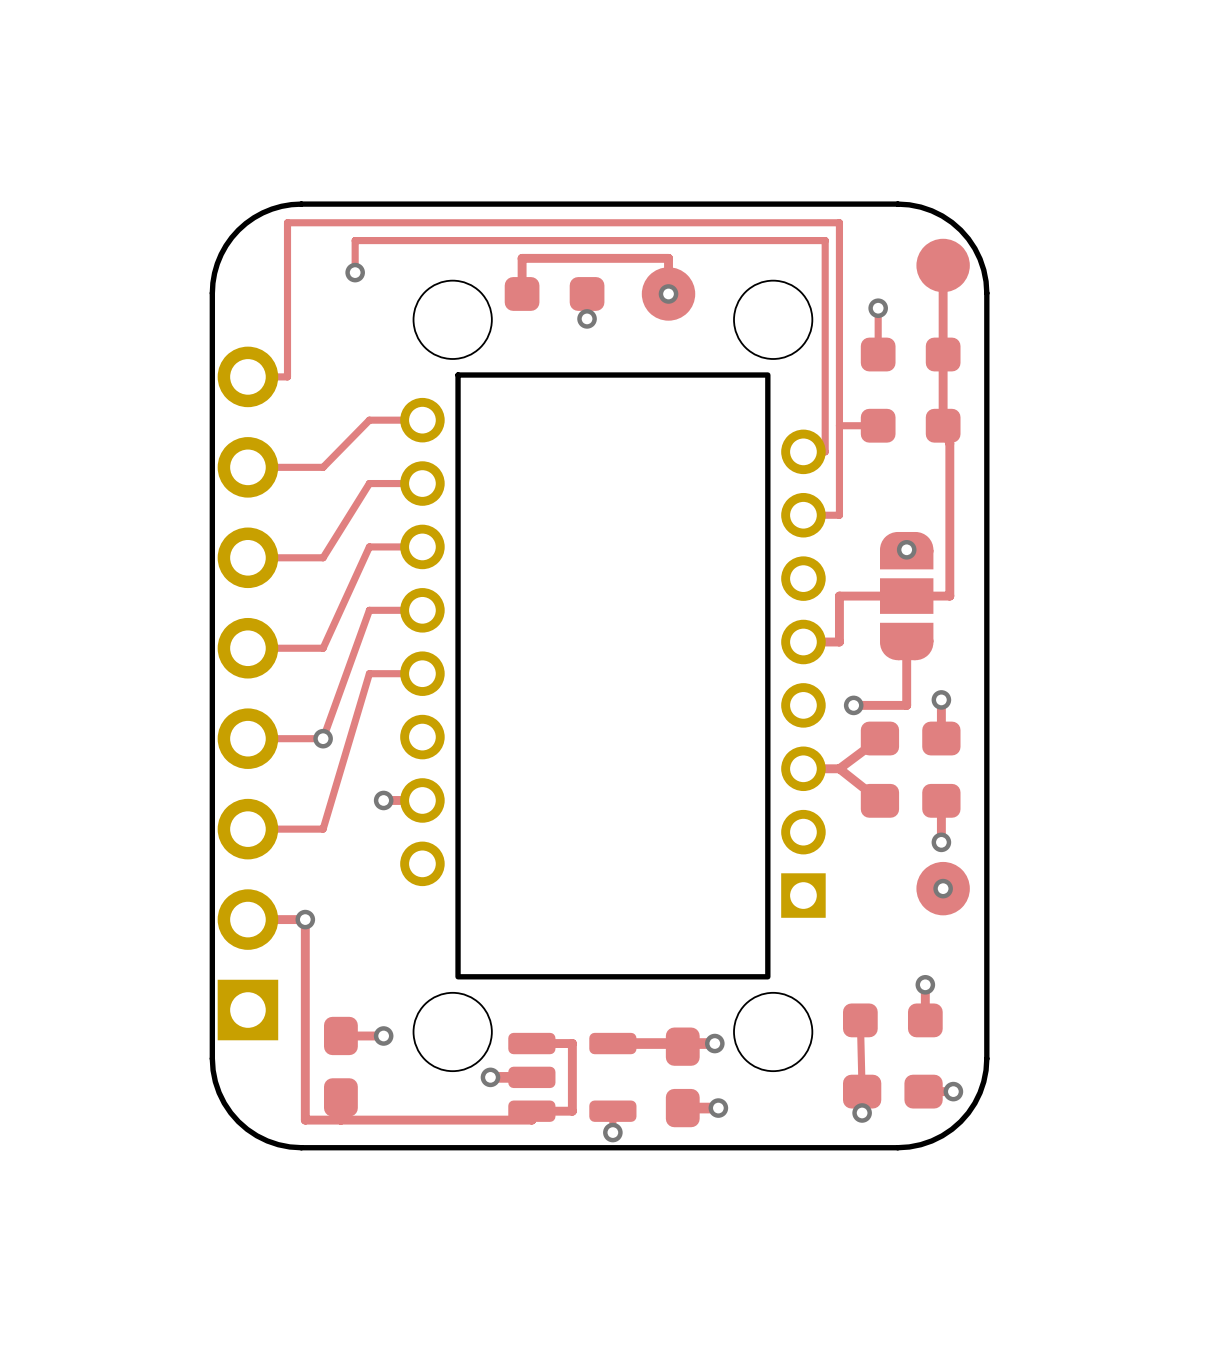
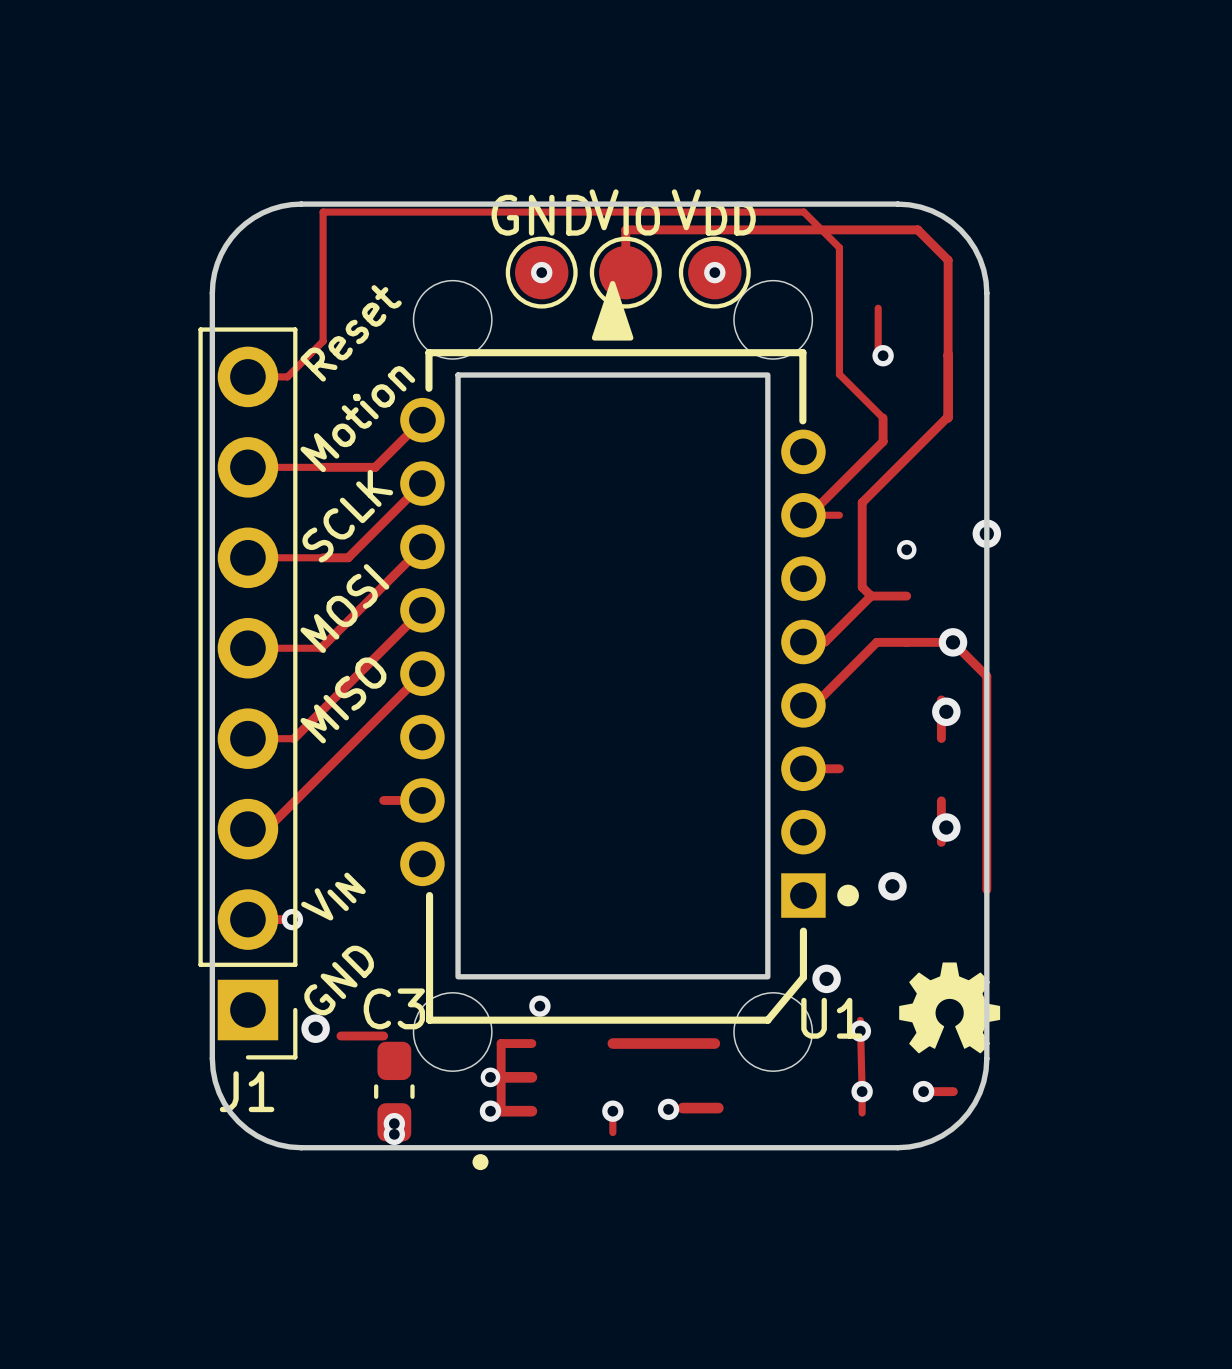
track: (839, 247) (839, 222) (287, 222) (287, 376) -> (839, 247) (803, 212) (323, 212) (323, 341) (287, 376)
track: (943, 265) (943, 425) (949, 443) (949, 596) (906, 596) -> none
part: (943, 265) -> none
track: (355, 272) (355, 240) (825, 240) (825, 451) (803, 451) -> none
via: (355, 272) -> none
via: none -> (541, 272)
part: none -> (625, 272)
part: none -> (714, 272)
via: none -> (714, 272)
part footprint: [504, 277, 605, 311] -> [505, 236, 578, 309]
drawing: none -> [591, 280, 634, 341]
track: (522, 293) (522, 258) (668, 258) (668, 293) -> none
part: (668, 293) -> none
via: (668, 293) -> none
via: (878, 308) -> none
via: (587, 318) -> none
text: none -> Reset (351, 333)
part: (910, 354) -> none
via: none -> (883, 355)
track: (839, 374) (839, 515) -> (839, 374) (883, 418) (883, 441) (809, 515)
text: none -> Motion (357, 419)
track: (422, 420) (369, 420) (323, 467) -> (422, 420) (375, 467) (323, 467)
track: (839, 425) (878, 425) -> none
part: (910, 425) -> none
track: (422, 483) (369, 483) (323, 557) -> (422, 483) (348, 557) (323, 557)
text: none -> SCLK (347, 516)
via: none -> (986, 533)
track: (422, 546) (369, 546) (323, 648) (321, 648) -> (422, 546) (321, 648)
track: (871, 596) (839, 596) (839, 642) (825, 642) -> (625, 272) (625, 229) (917, 229) (948, 260) (948, 418) (862, 502) (862, 587) (871, 596) (825, 642)
part: (906, 596) -> none
text: none -> MOSI (344, 608)
track: (422, 610) (369, 610) (323, 738) (294, 738) -> (422, 610) (294, 738)
track: (906, 642) (906, 705) (853, 705) -> none
via: none -> (952, 642)
track: (422, 673) (369, 673) (323, 829) (266, 829) -> (422, 673) (266, 829)
part: (612, 675) -> none
U1: none -> (629, 686)
via size: [931, 690, 952, 710] -> [932, 697, 961, 727]
part: (247, 693) -> none
J1: none -> (247, 693)
text: none -> MISO (343, 700)
track: none -> (803, 705) (813, 705) (876, 642) (952, 642) (986, 676) (986, 889)
via: (853, 705) -> none
via: (323, 738) -> none
track: (879, 738) (839, 768) (879, 800) -> none
part: (910, 738) -> none
via: (383, 800) -> none
part: (910, 800) -> none
via size: [931, 832, 952, 853] -> [932, 813, 961, 842]
via: none -> (892, 886)
part: (943, 888) -> none
via: (943, 888) -> none
text: none -> VIN (333, 896)
track: (292, 919) (305, 919) (305, 1120) (531, 1120) (531, 1111) (572, 1111) (572, 1043) (531, 1043) -> (490, 1111) (531, 1111) (501, 1111) (501, 1043) (531, 1043)
via position: (305, 919) -> (292, 919)
drawing: none -> [899, 962, 1001, 1054]
via: none -> (826, 978)
text: none -> GND (339, 980)
via: (925, 984) -> none
via: none -> (539, 1006)
part: (892, 1020) -> none
via: none -> (315, 1028)
via: none -> (860, 1031)
via: (383, 1035) -> none
via: (714, 1043) -> none
part: (340, 1066) -> none
part: (572, 1077) -> none
part: (682, 1077) -> none
C3: none -> (394, 1091)
via: none -> (862, 1091)
part: (892, 1091) -> none
via: none -> (923, 1091)
via: (953, 1091) -> none
via: (718, 1108) -> none
via: none -> (668, 1109)
via: none -> (490, 1111)
via: none -> (612, 1111)
via: (862, 1112) -> none
via: none -> (394, 1123)
via: (612, 1132) -> none
via: none -> (394, 1134)
drawing: none -> [472, 1154, 489, 1171]

